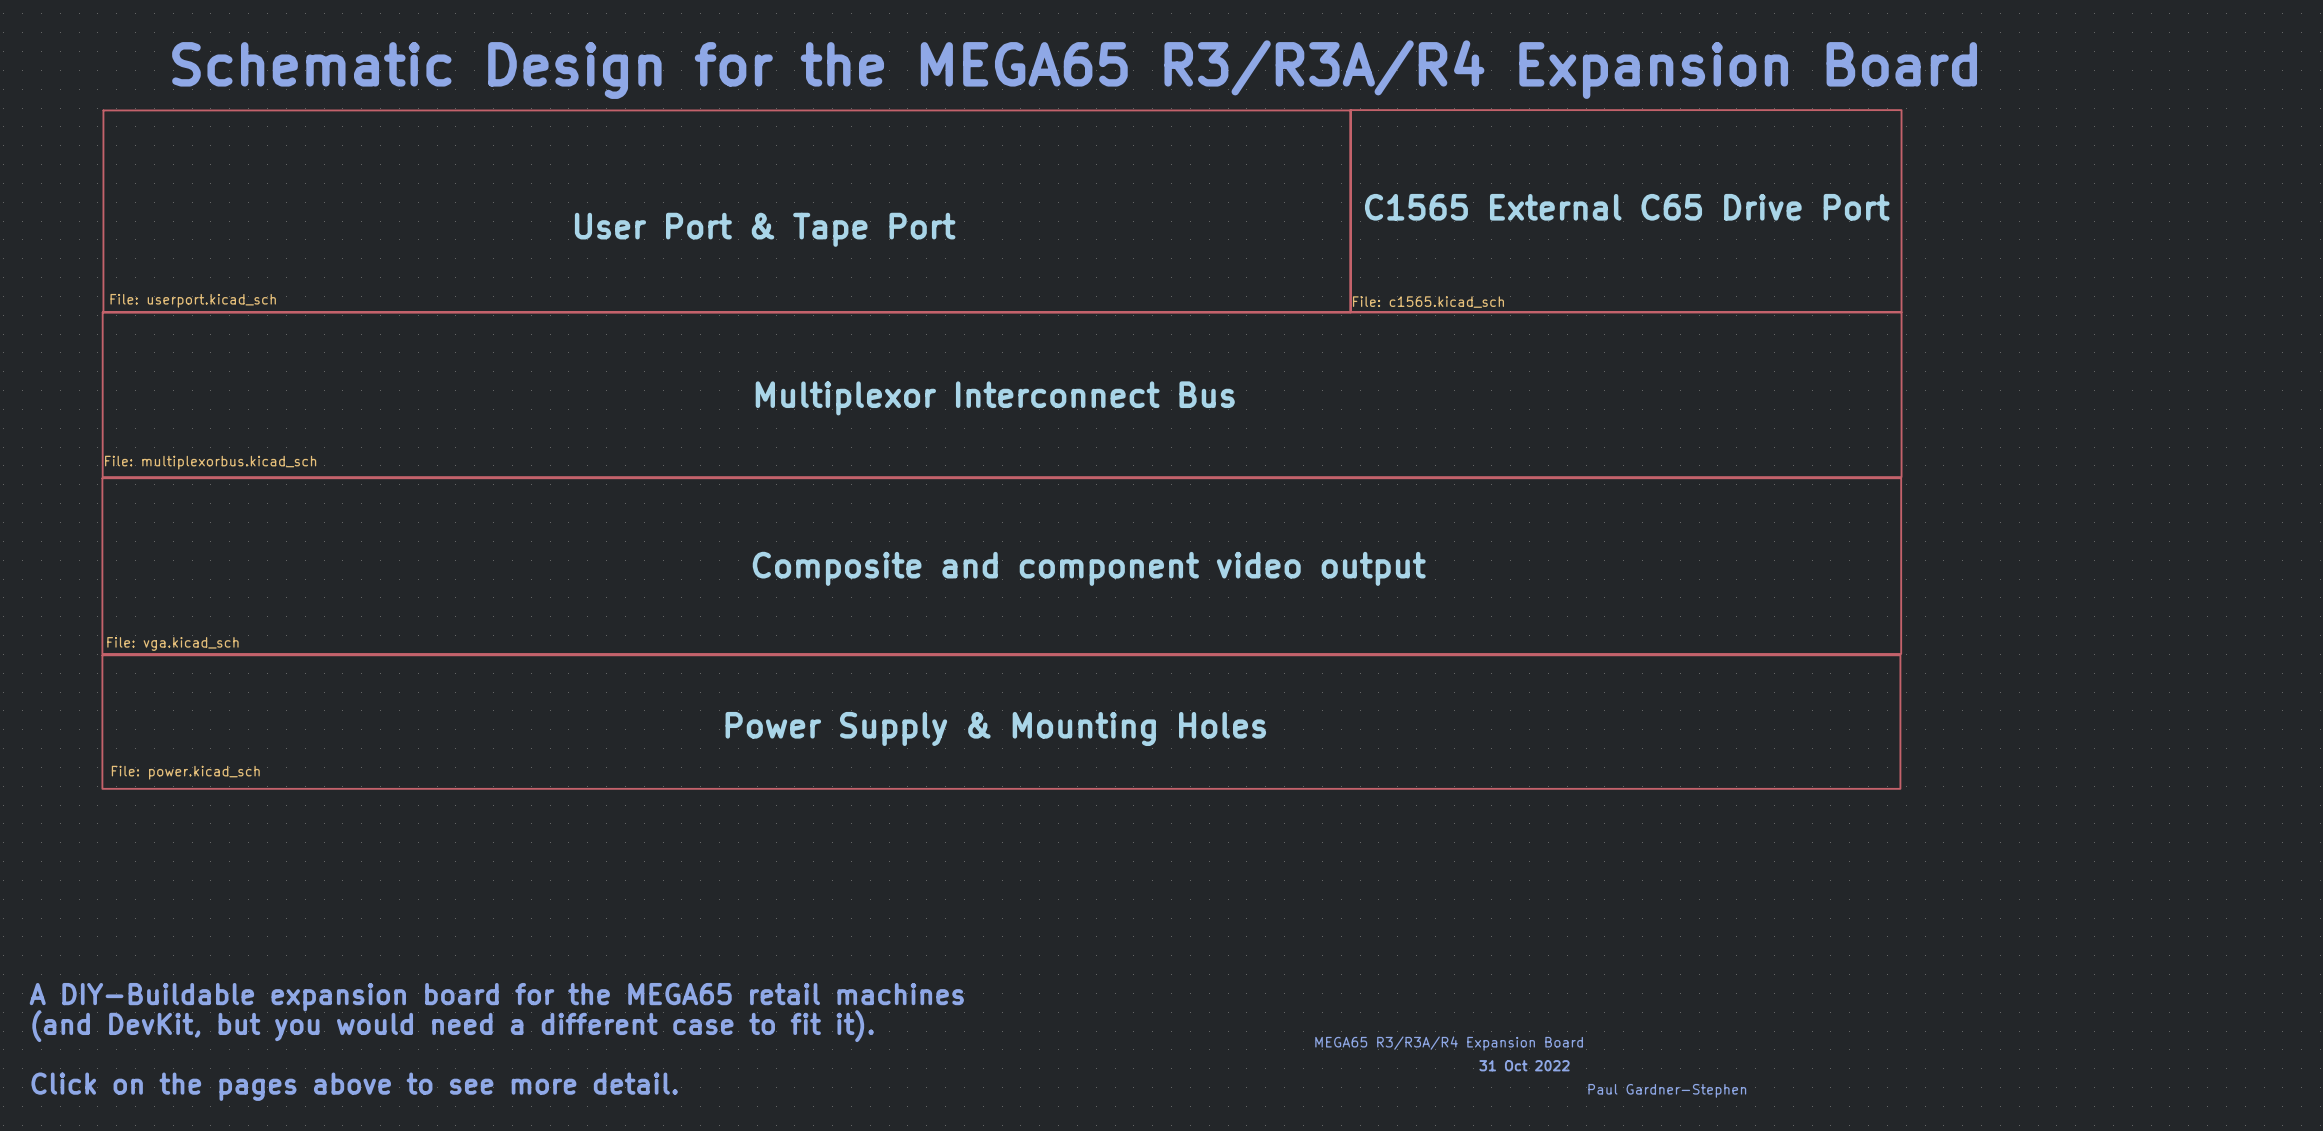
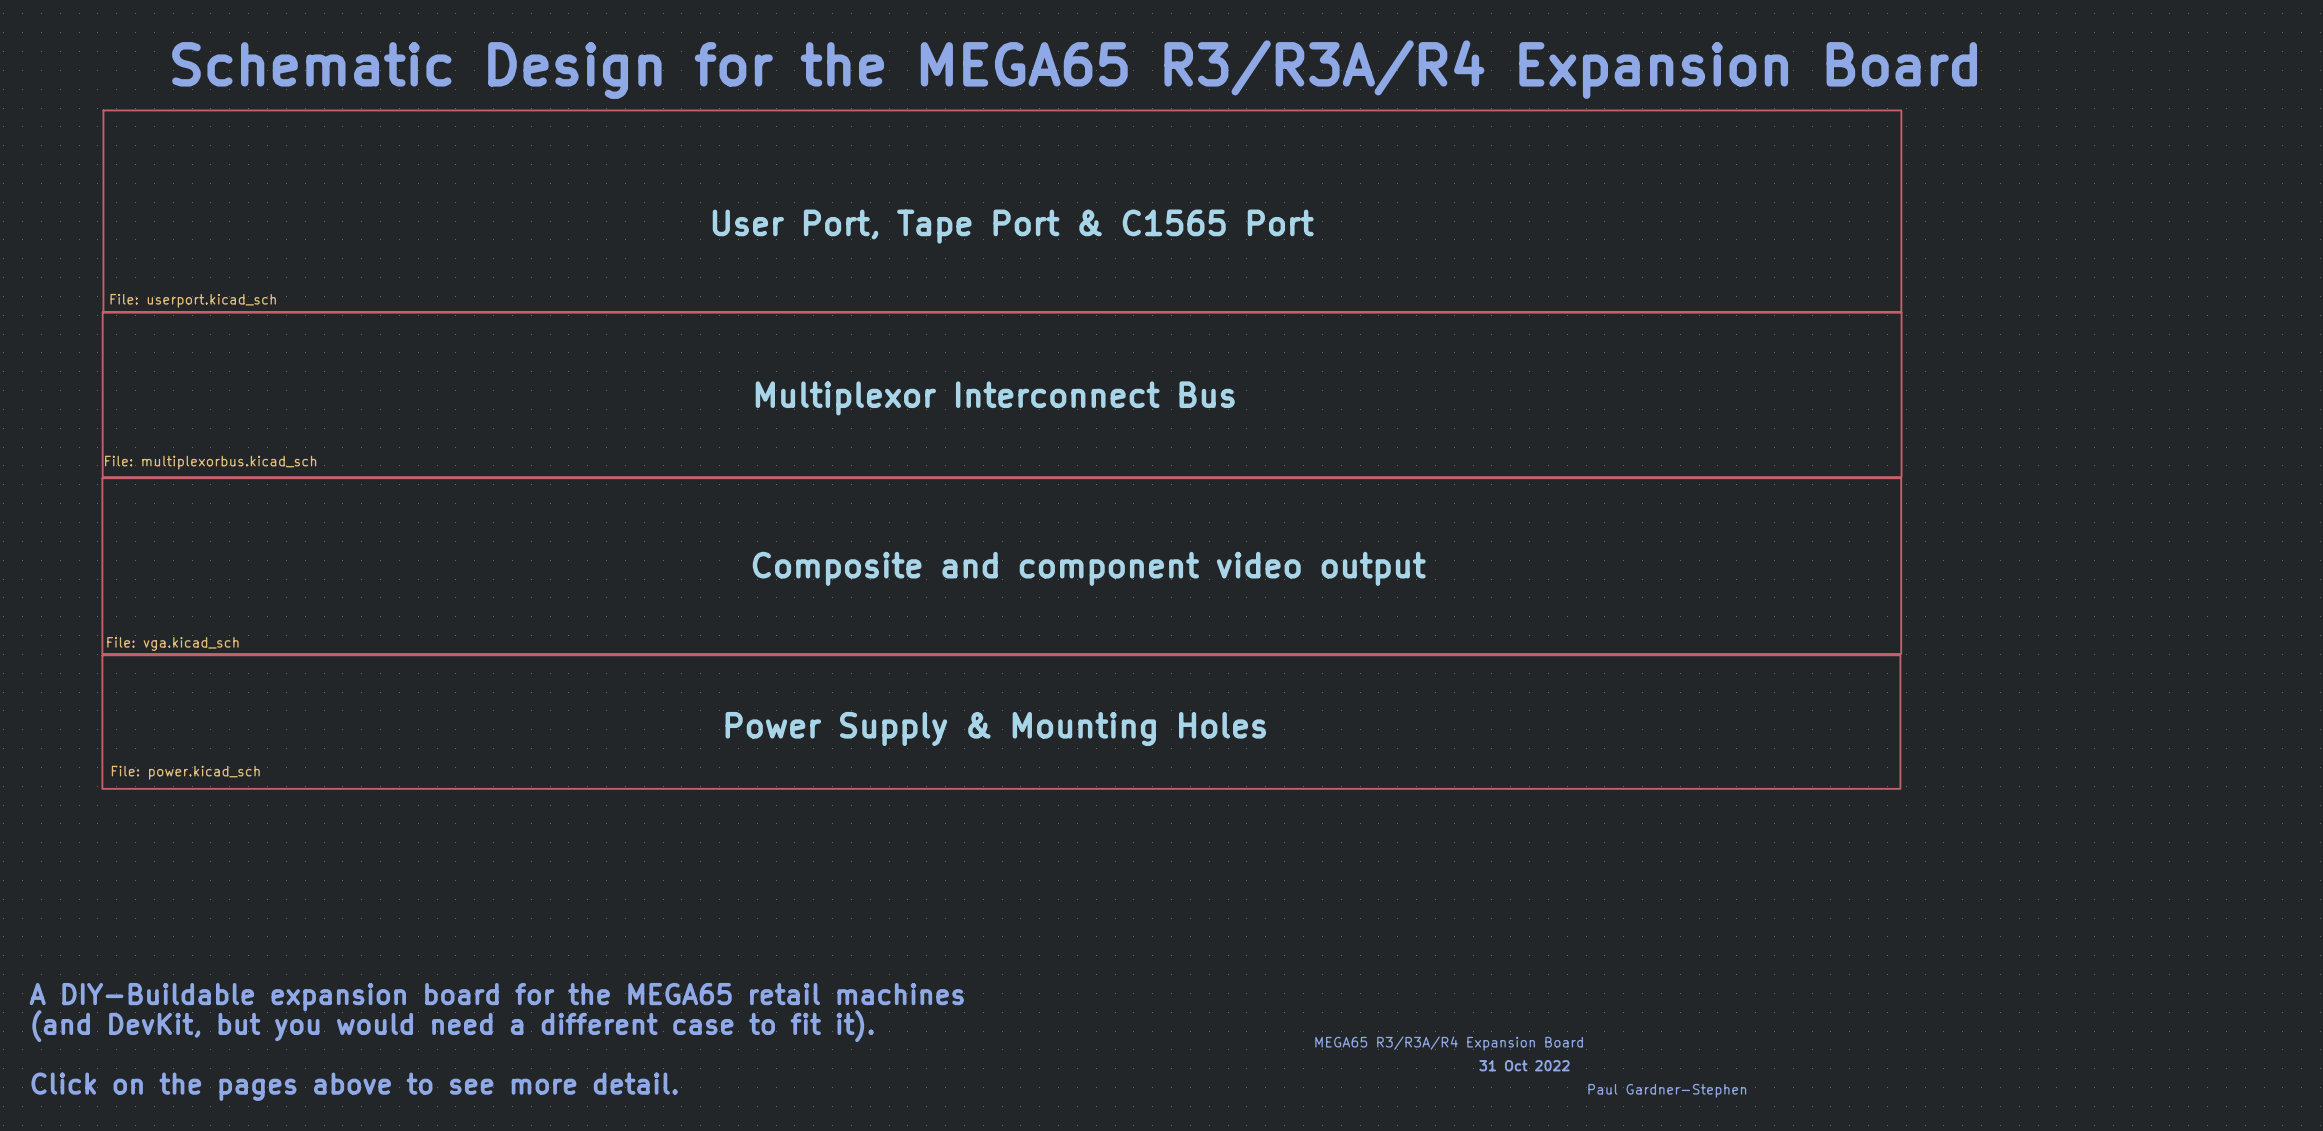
sheet User Port & Tape Port: File: userport.kicad_sch (727, 211) -> none
sheet User Port, Tape Port & C1565 Port: none -> File: userport.kicad_sch (1002, 211)
sheet C1565 External C65 Drive Port: File: c1565.kicad_sch (1626, 211) -> none

